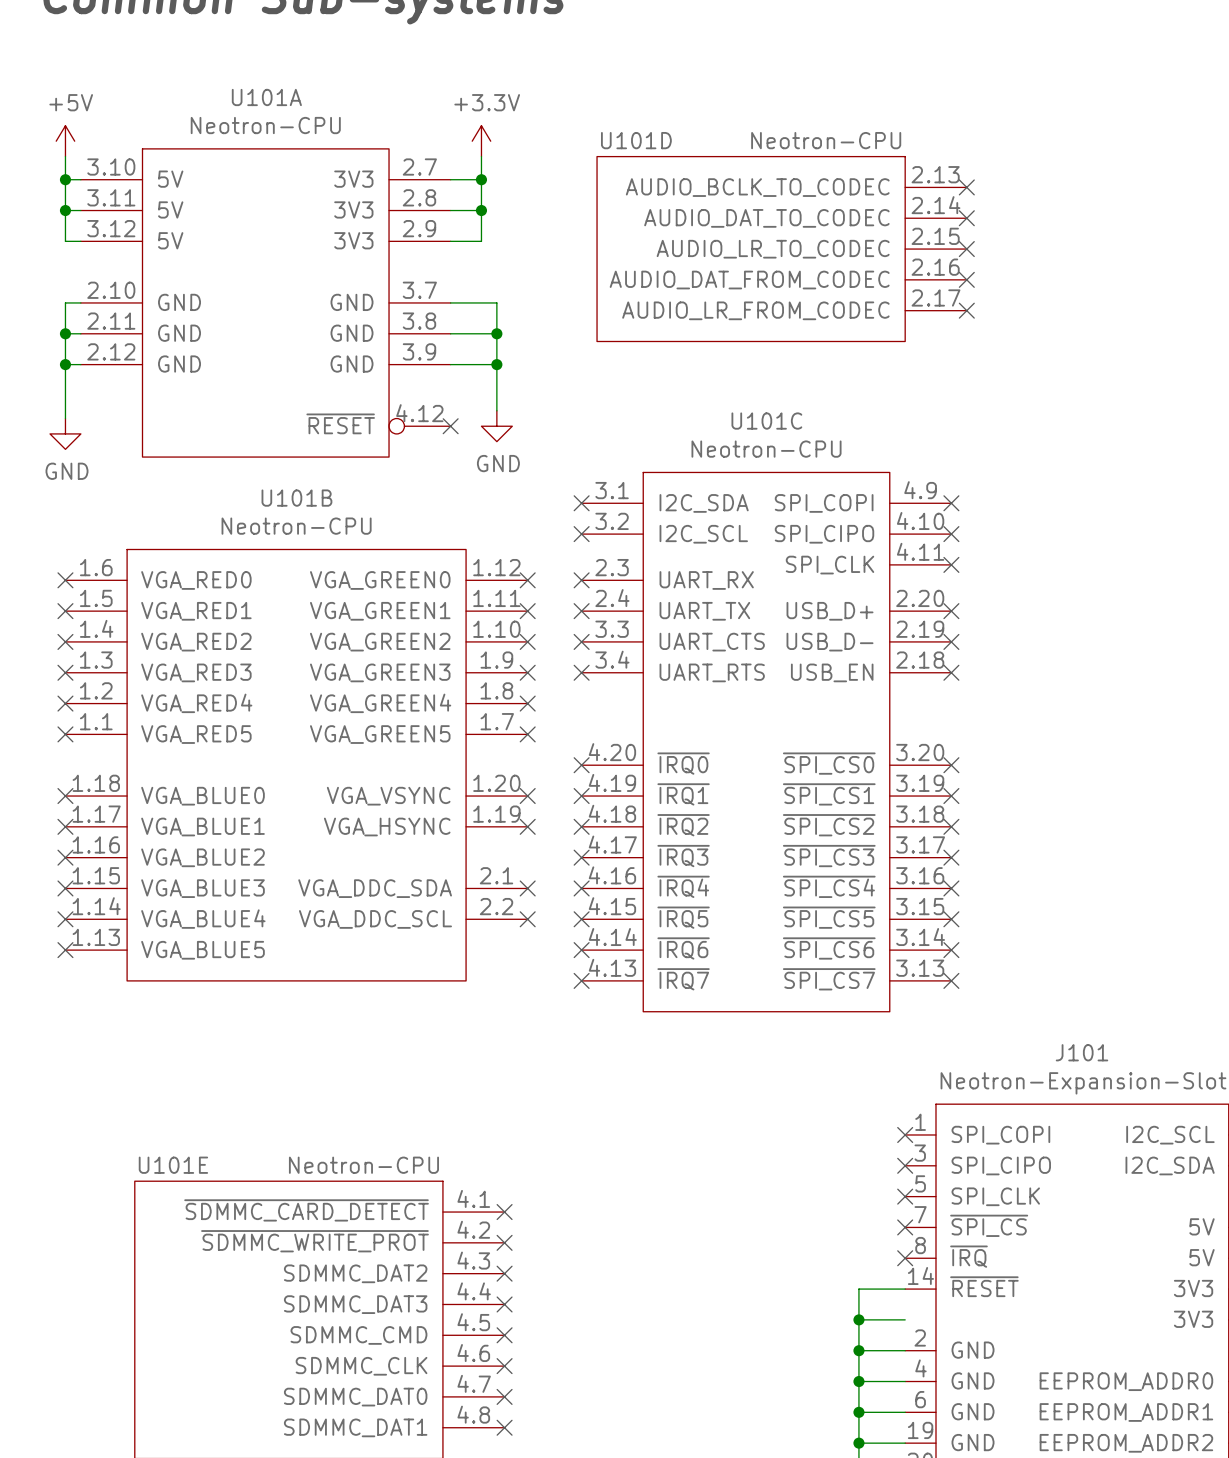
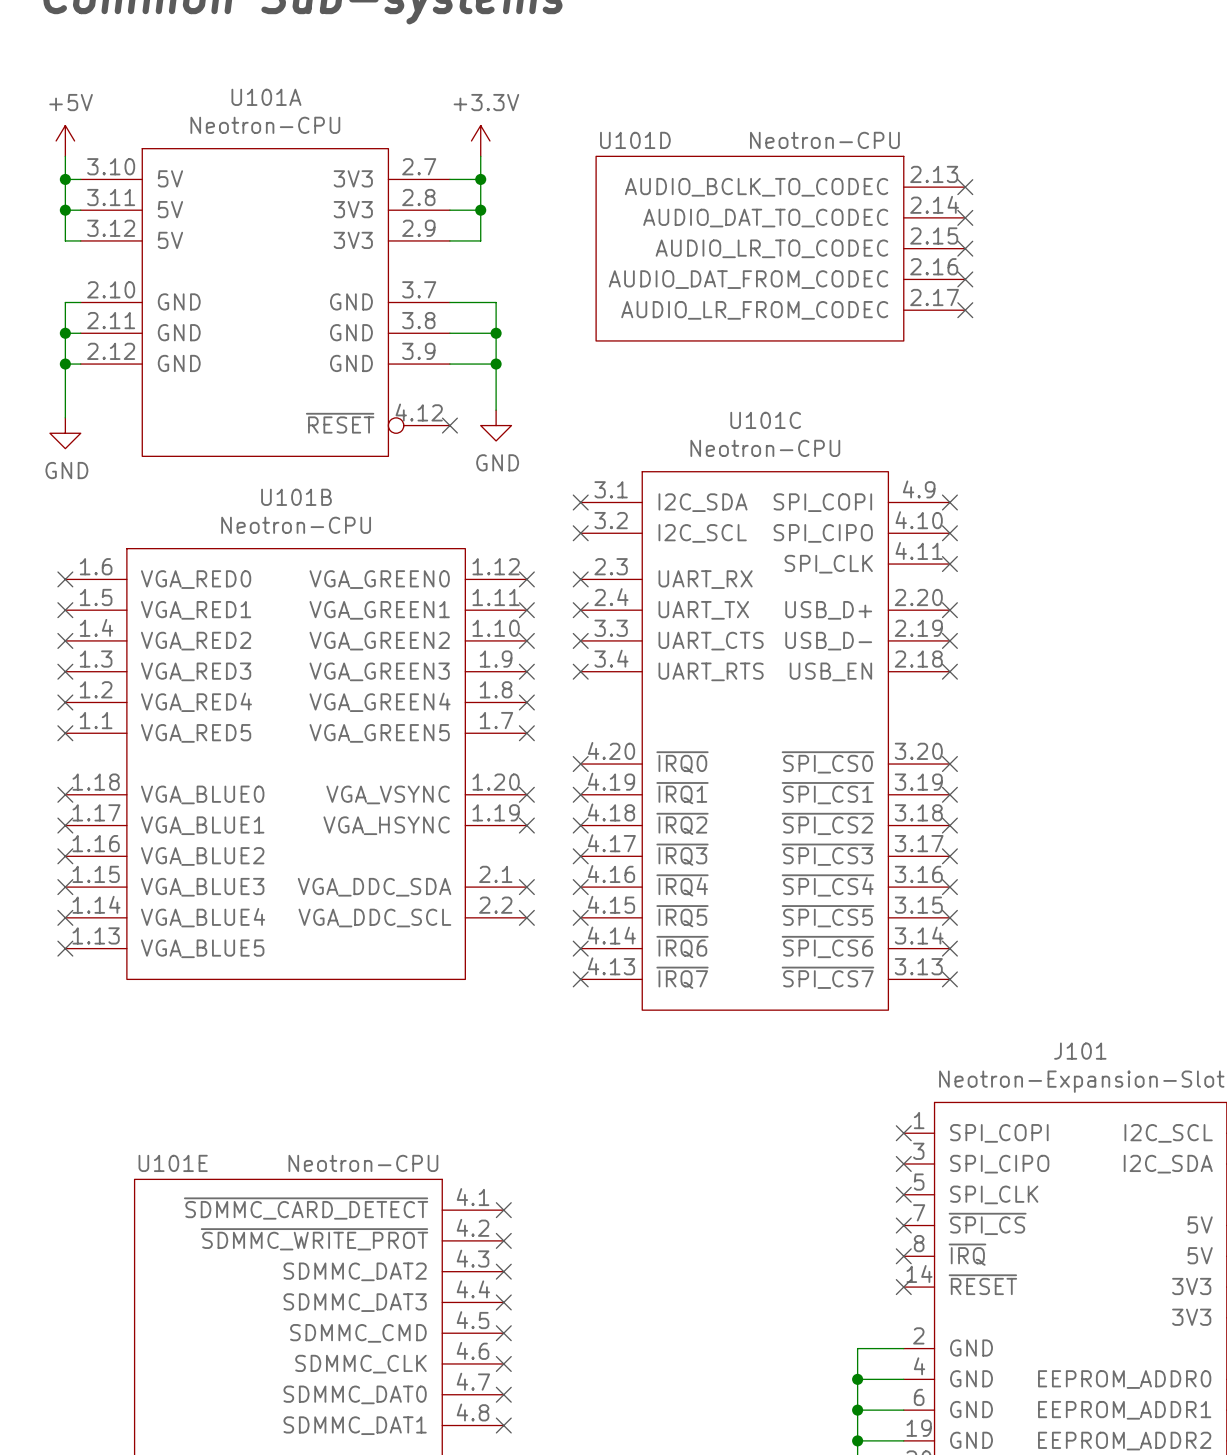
wire: (905, 1289) (858, 1289) (858, 1350) -> none
no-connect mark: none -> (903, 1287)
wire: (858, 1319) (905, 1319) -> none
junction: (858, 1319) -> none
junction: (858, 1350) -> none

